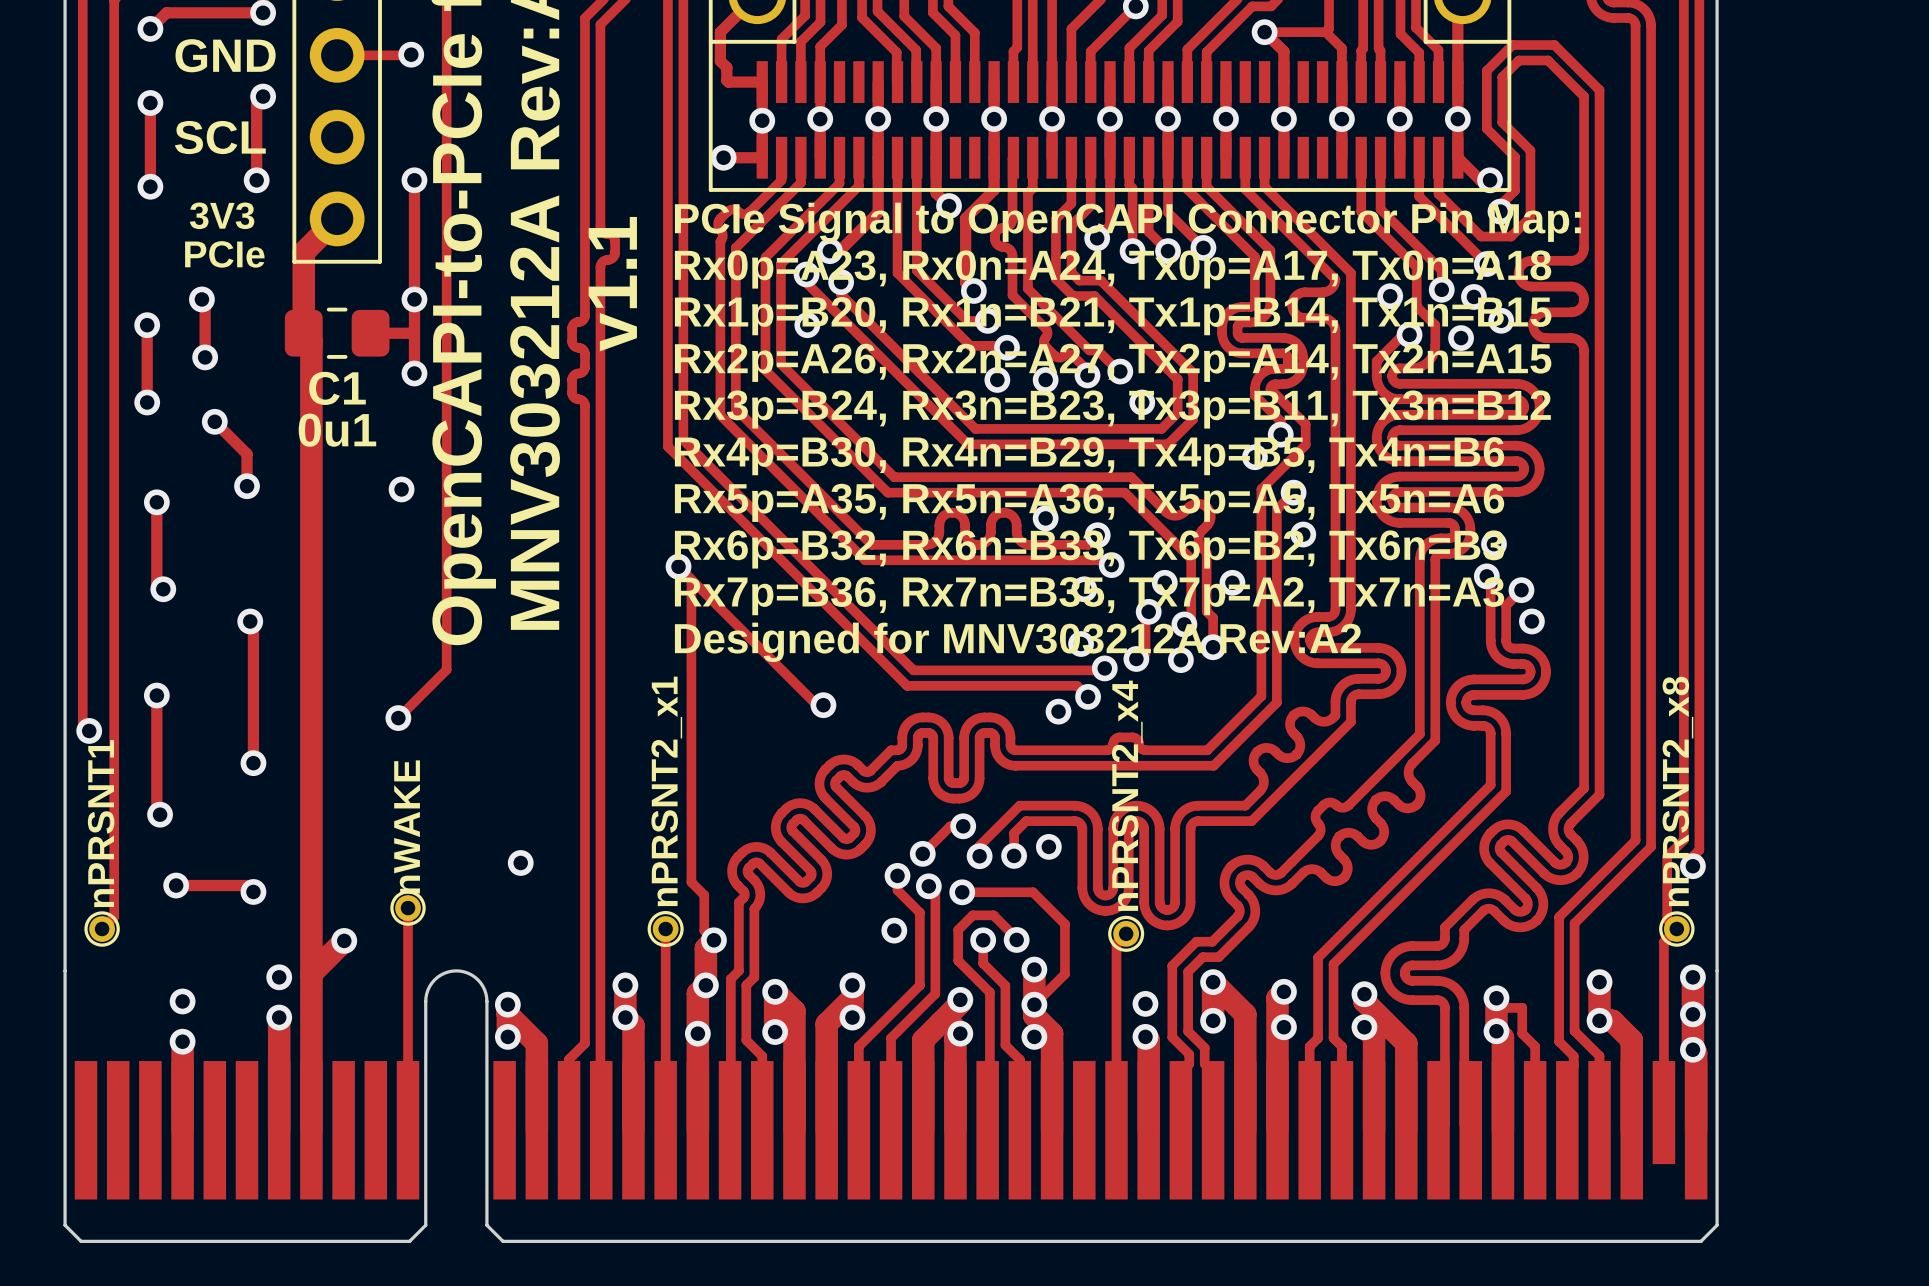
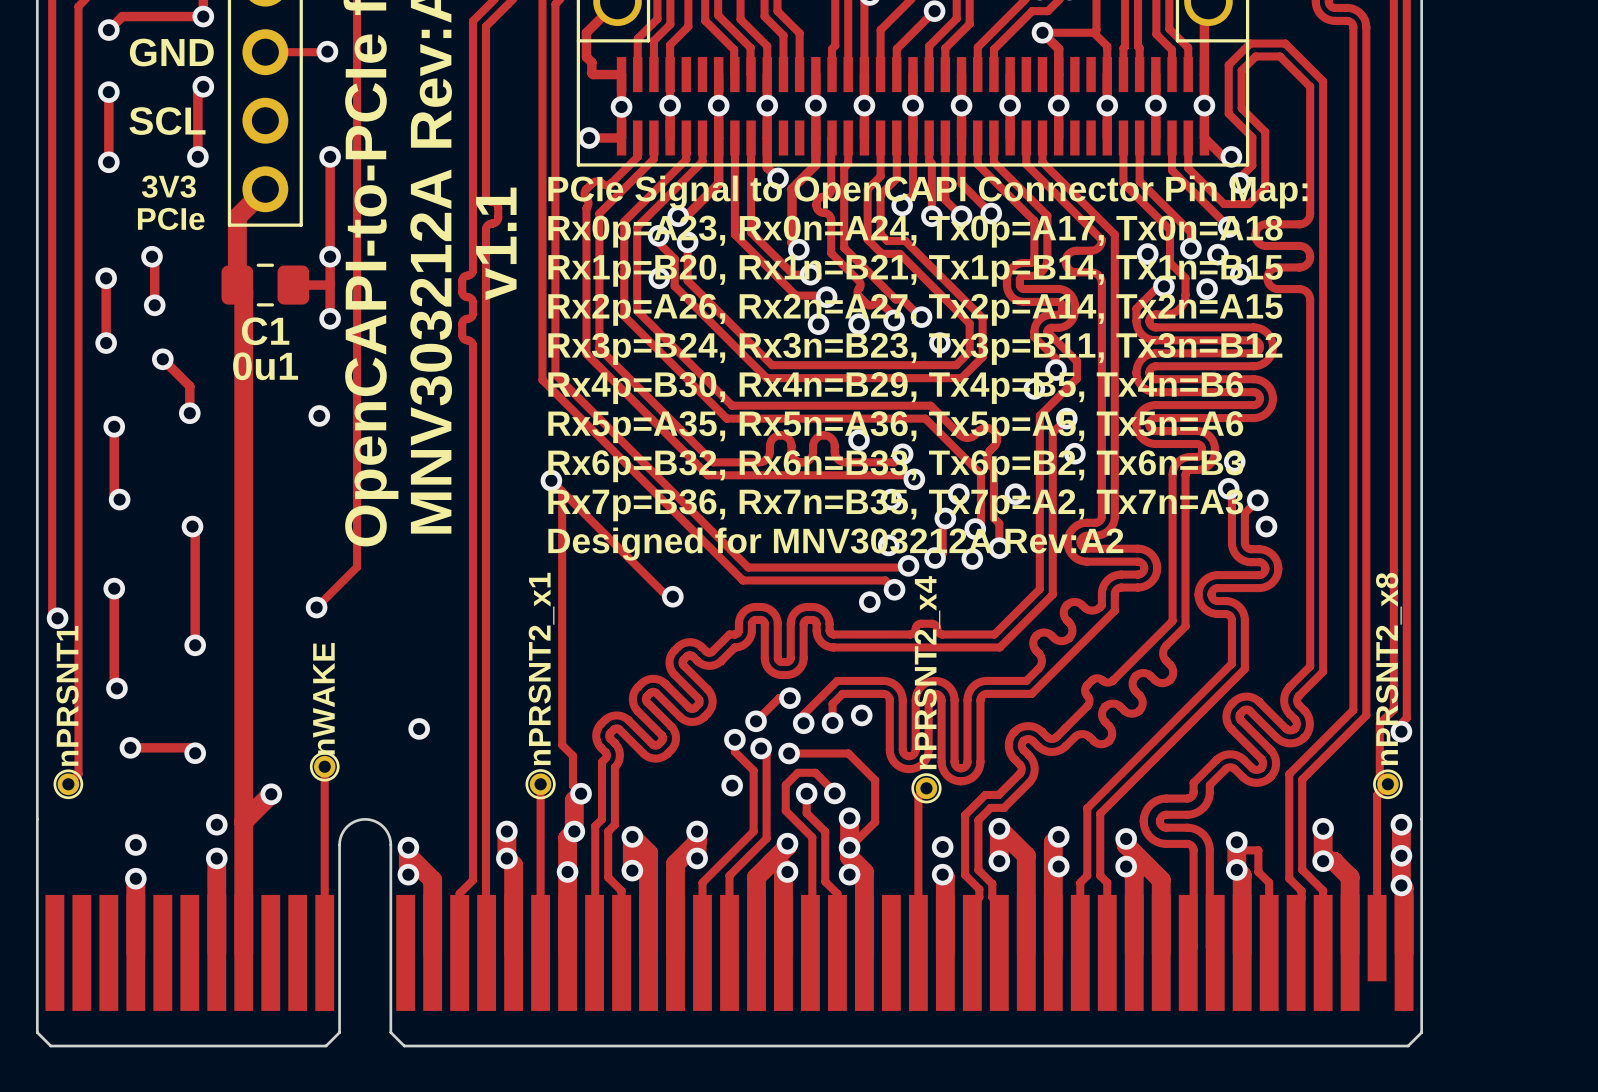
track: (841, 294) (975, 428) -> (687, 252) (687, 280) (772, 365) (800, 365)
track: (825, 302) (968, 444) -> (674, 258) (674, 286) (766, 378) (793, 378)

